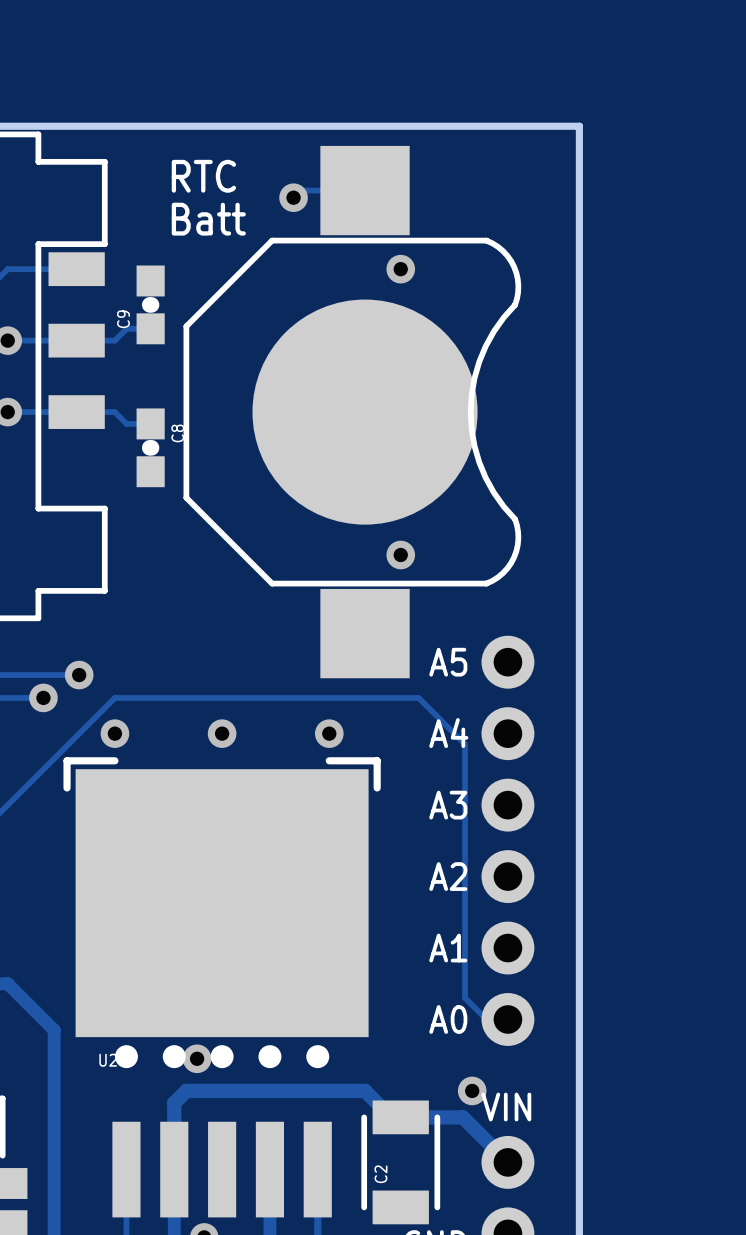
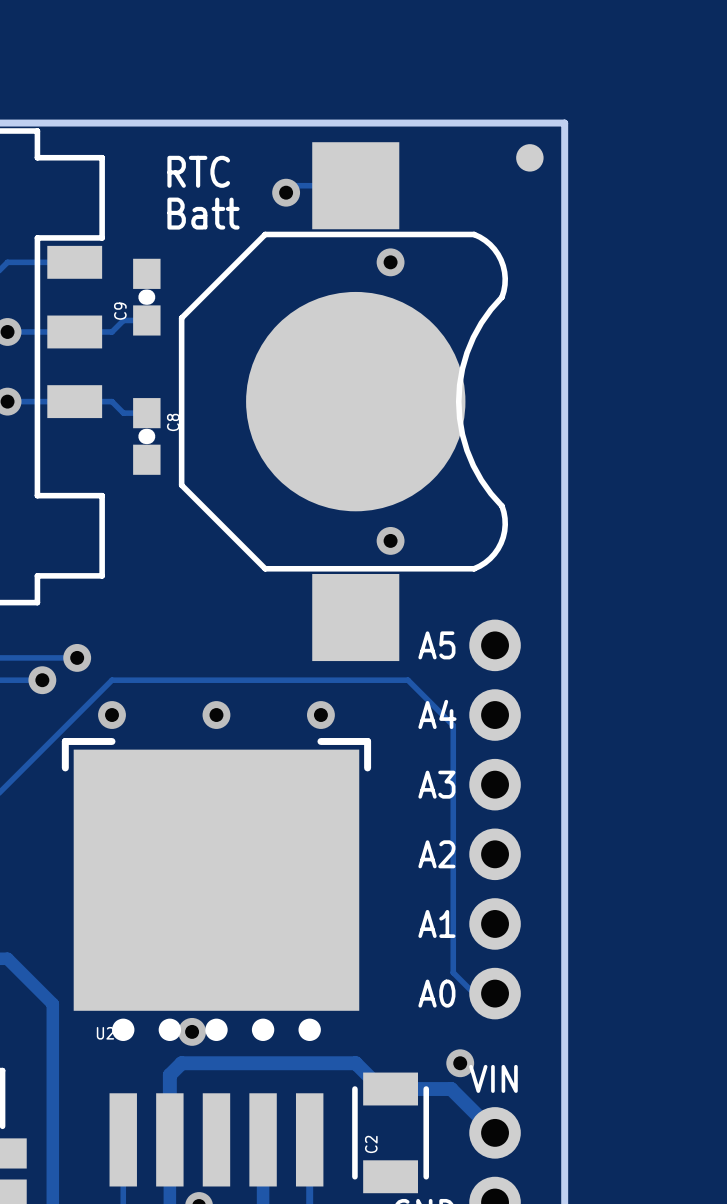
part: none -> (529, 157)

